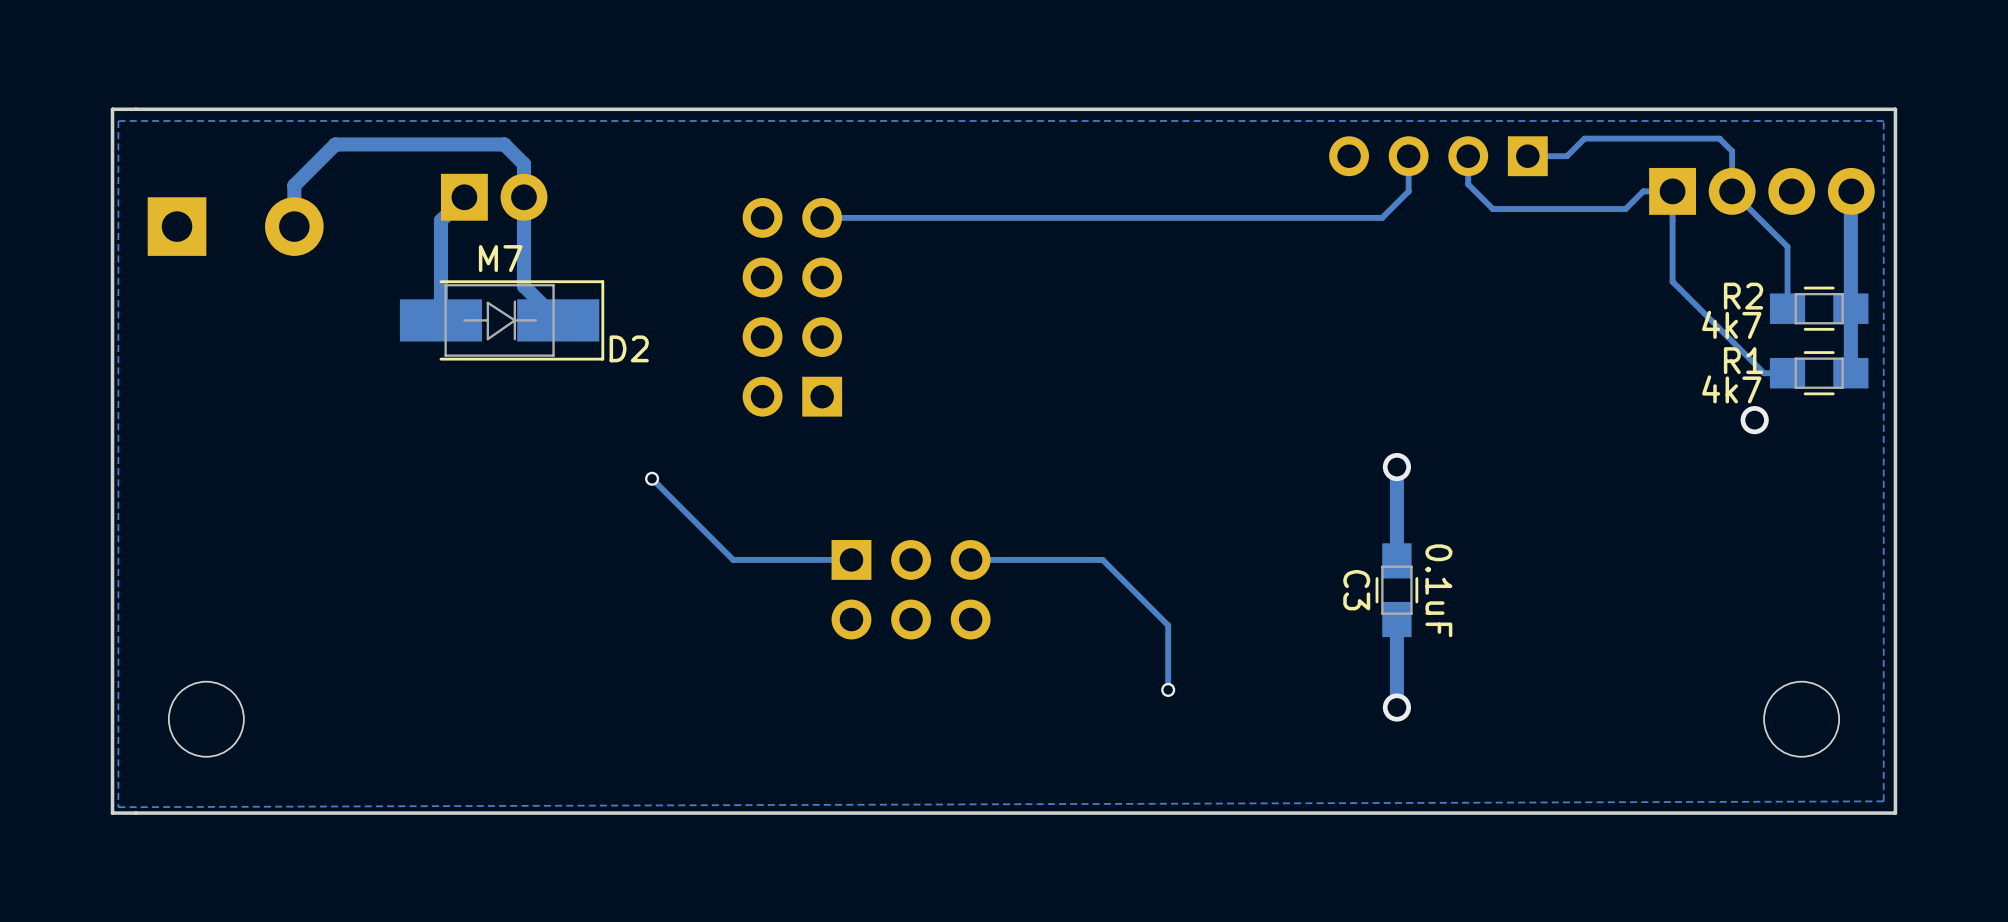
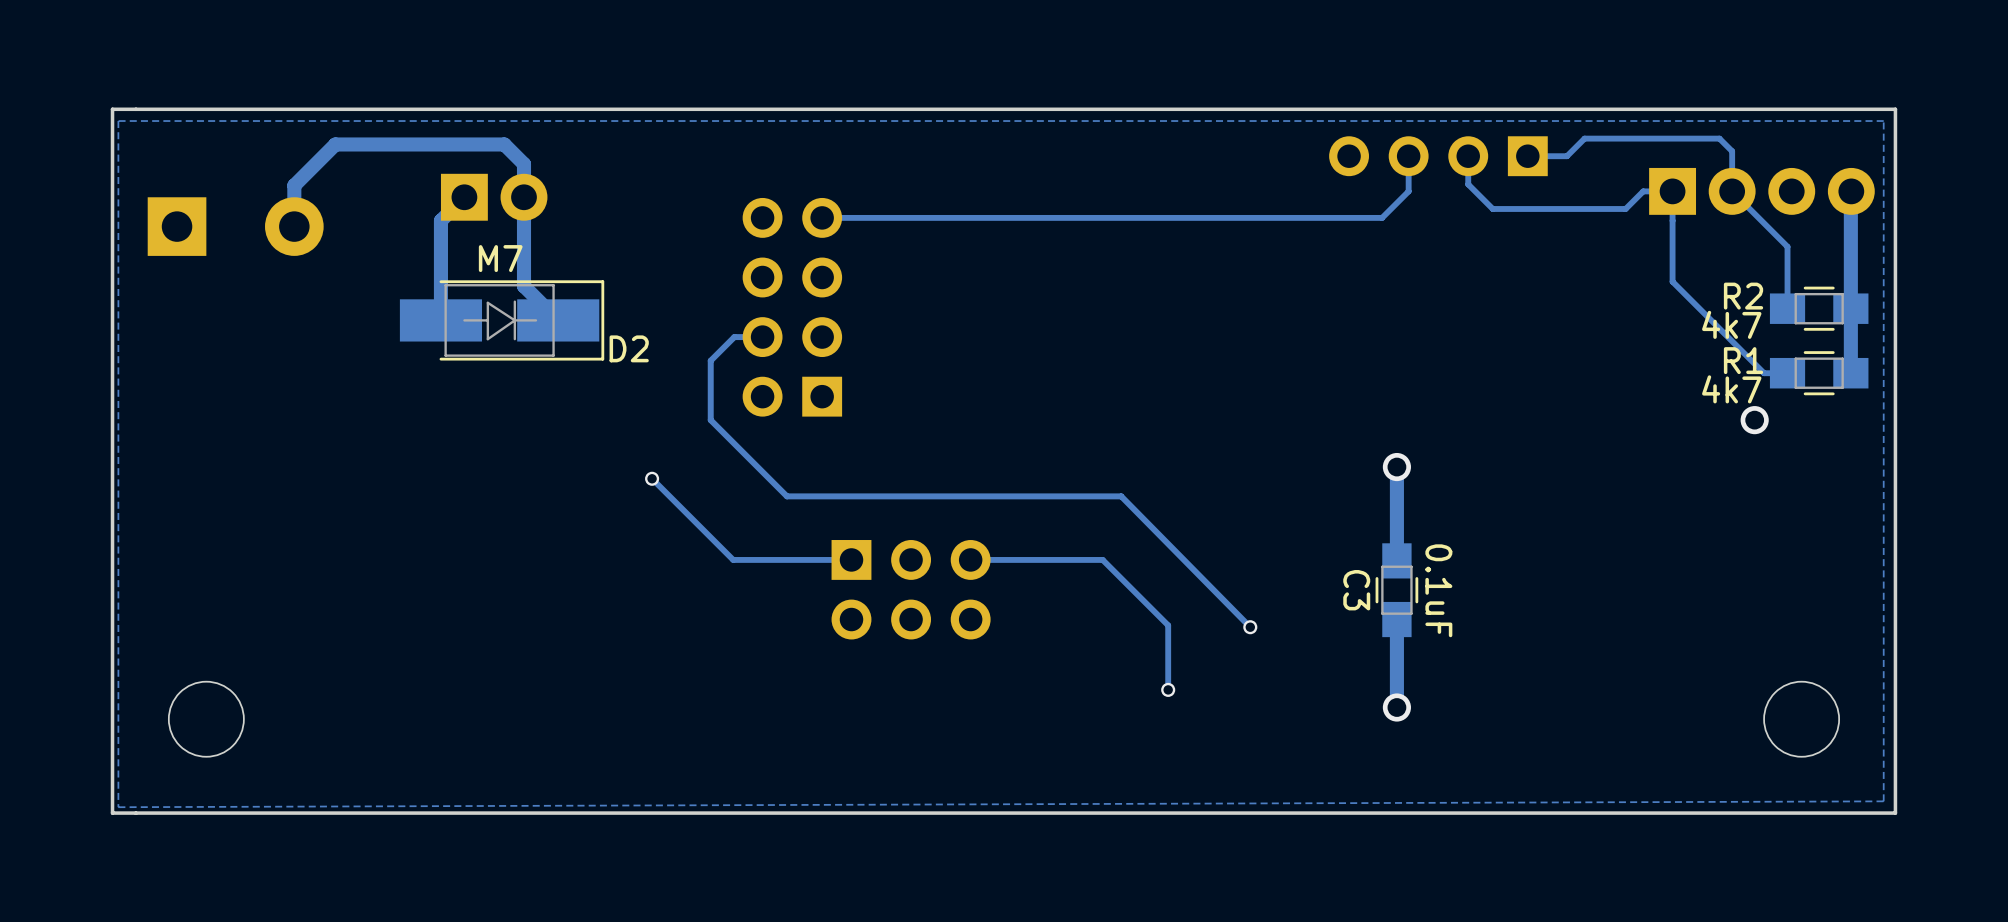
track: none -> (762, 337) (734, 337) (710, 360) (710, 420) (786, 496) (1121, 496) (1250, 627) (1250, 625)
via: none -> (1250, 627)

